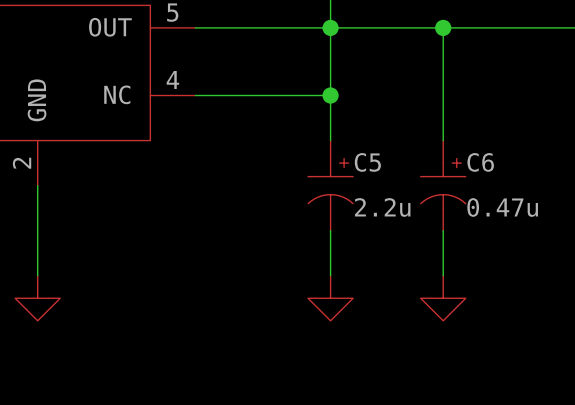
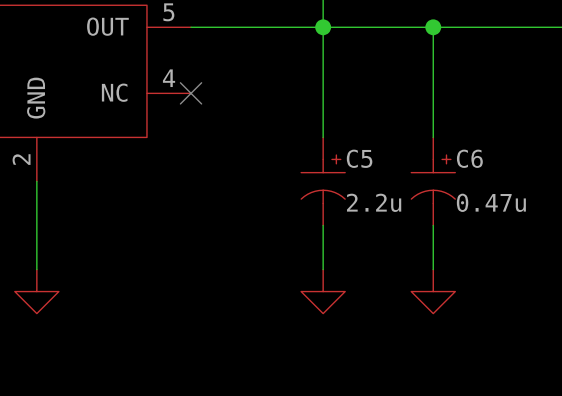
wire: (195, 95) (330, 95) -> none
no-connect mark: none -> (191, 93)
junction: (330, 95) -> none

